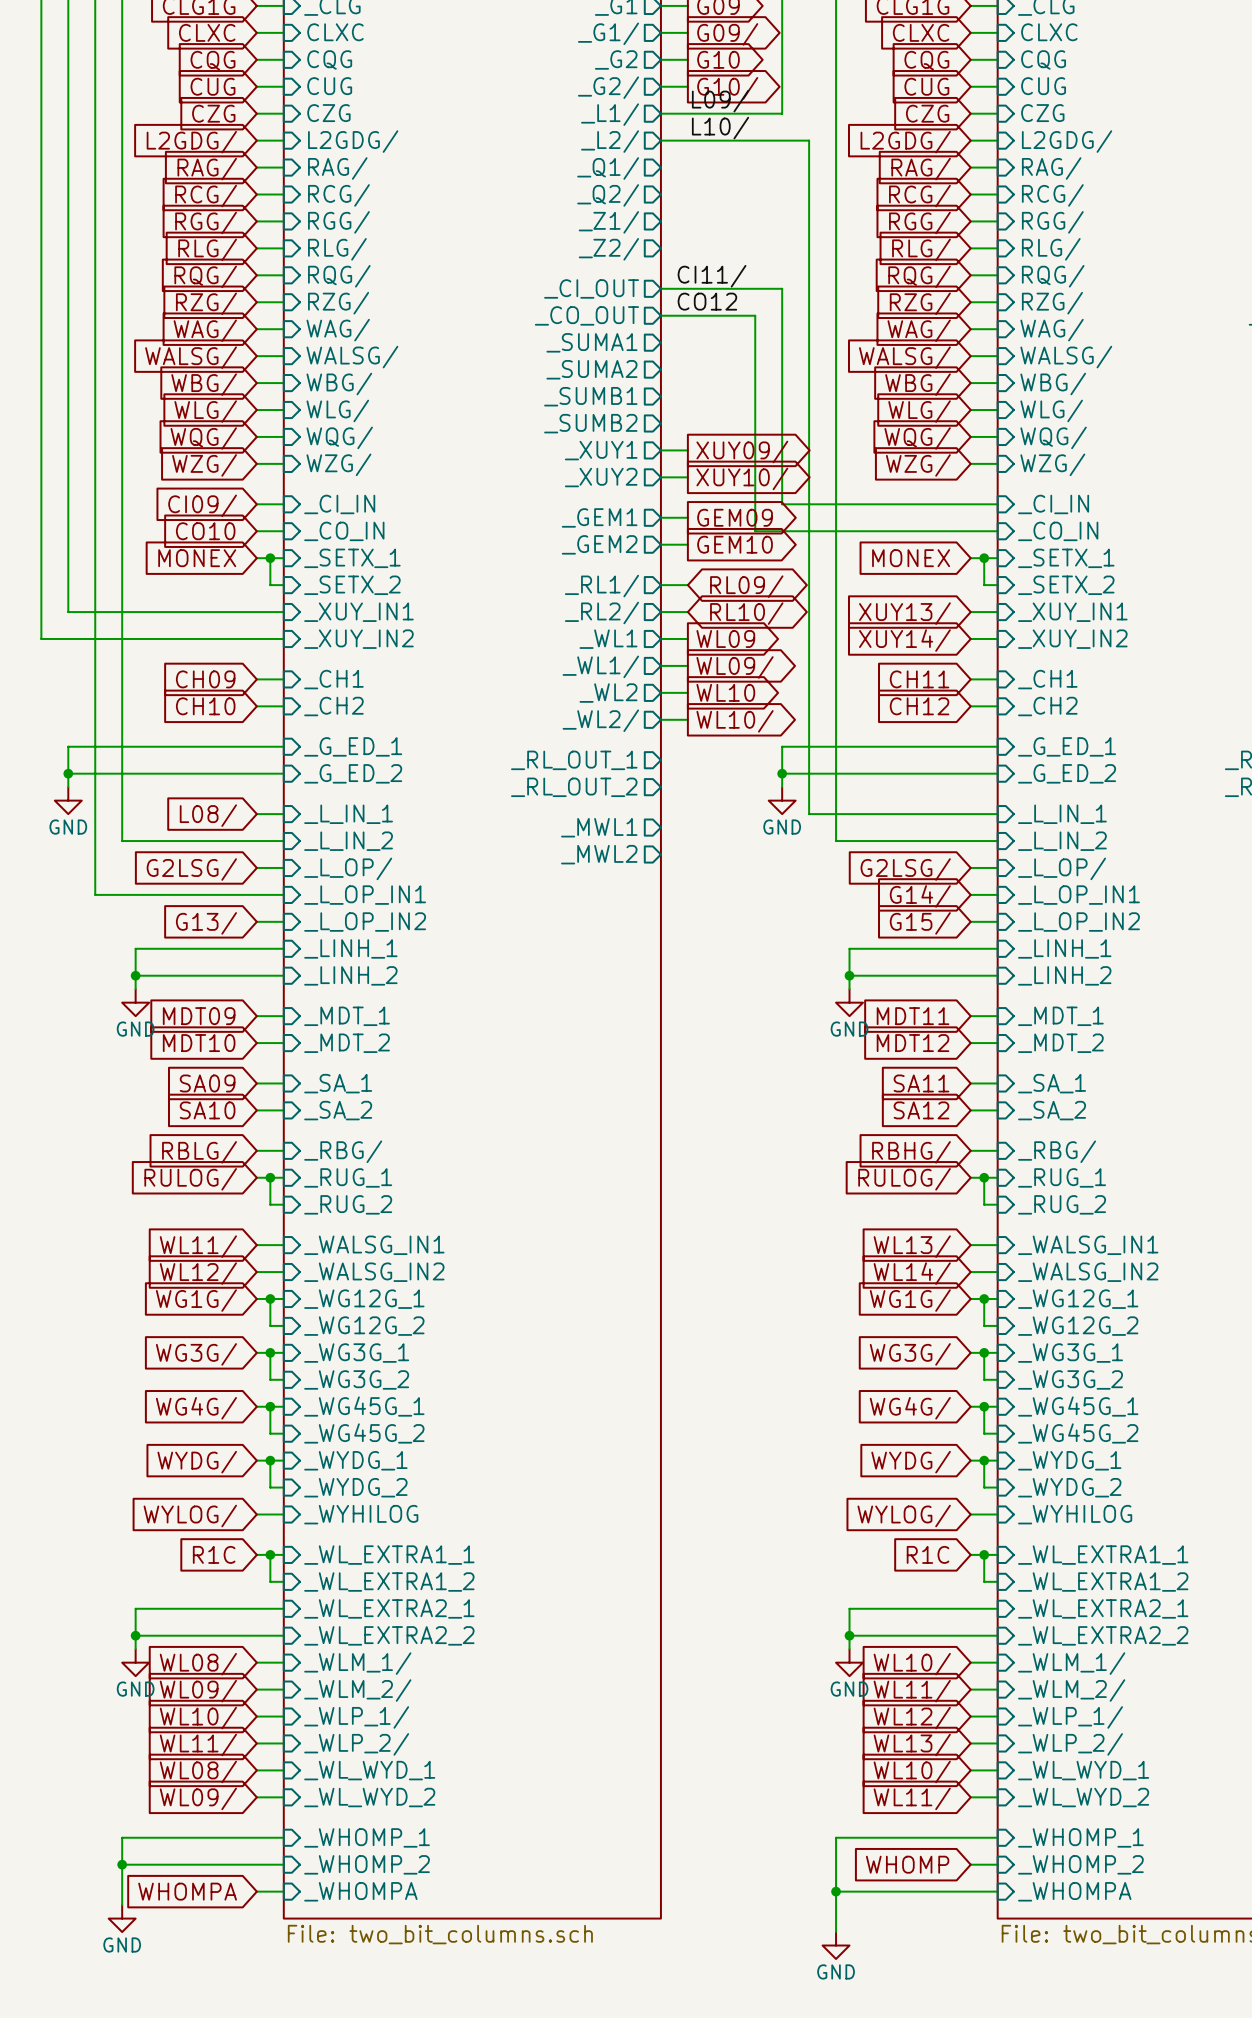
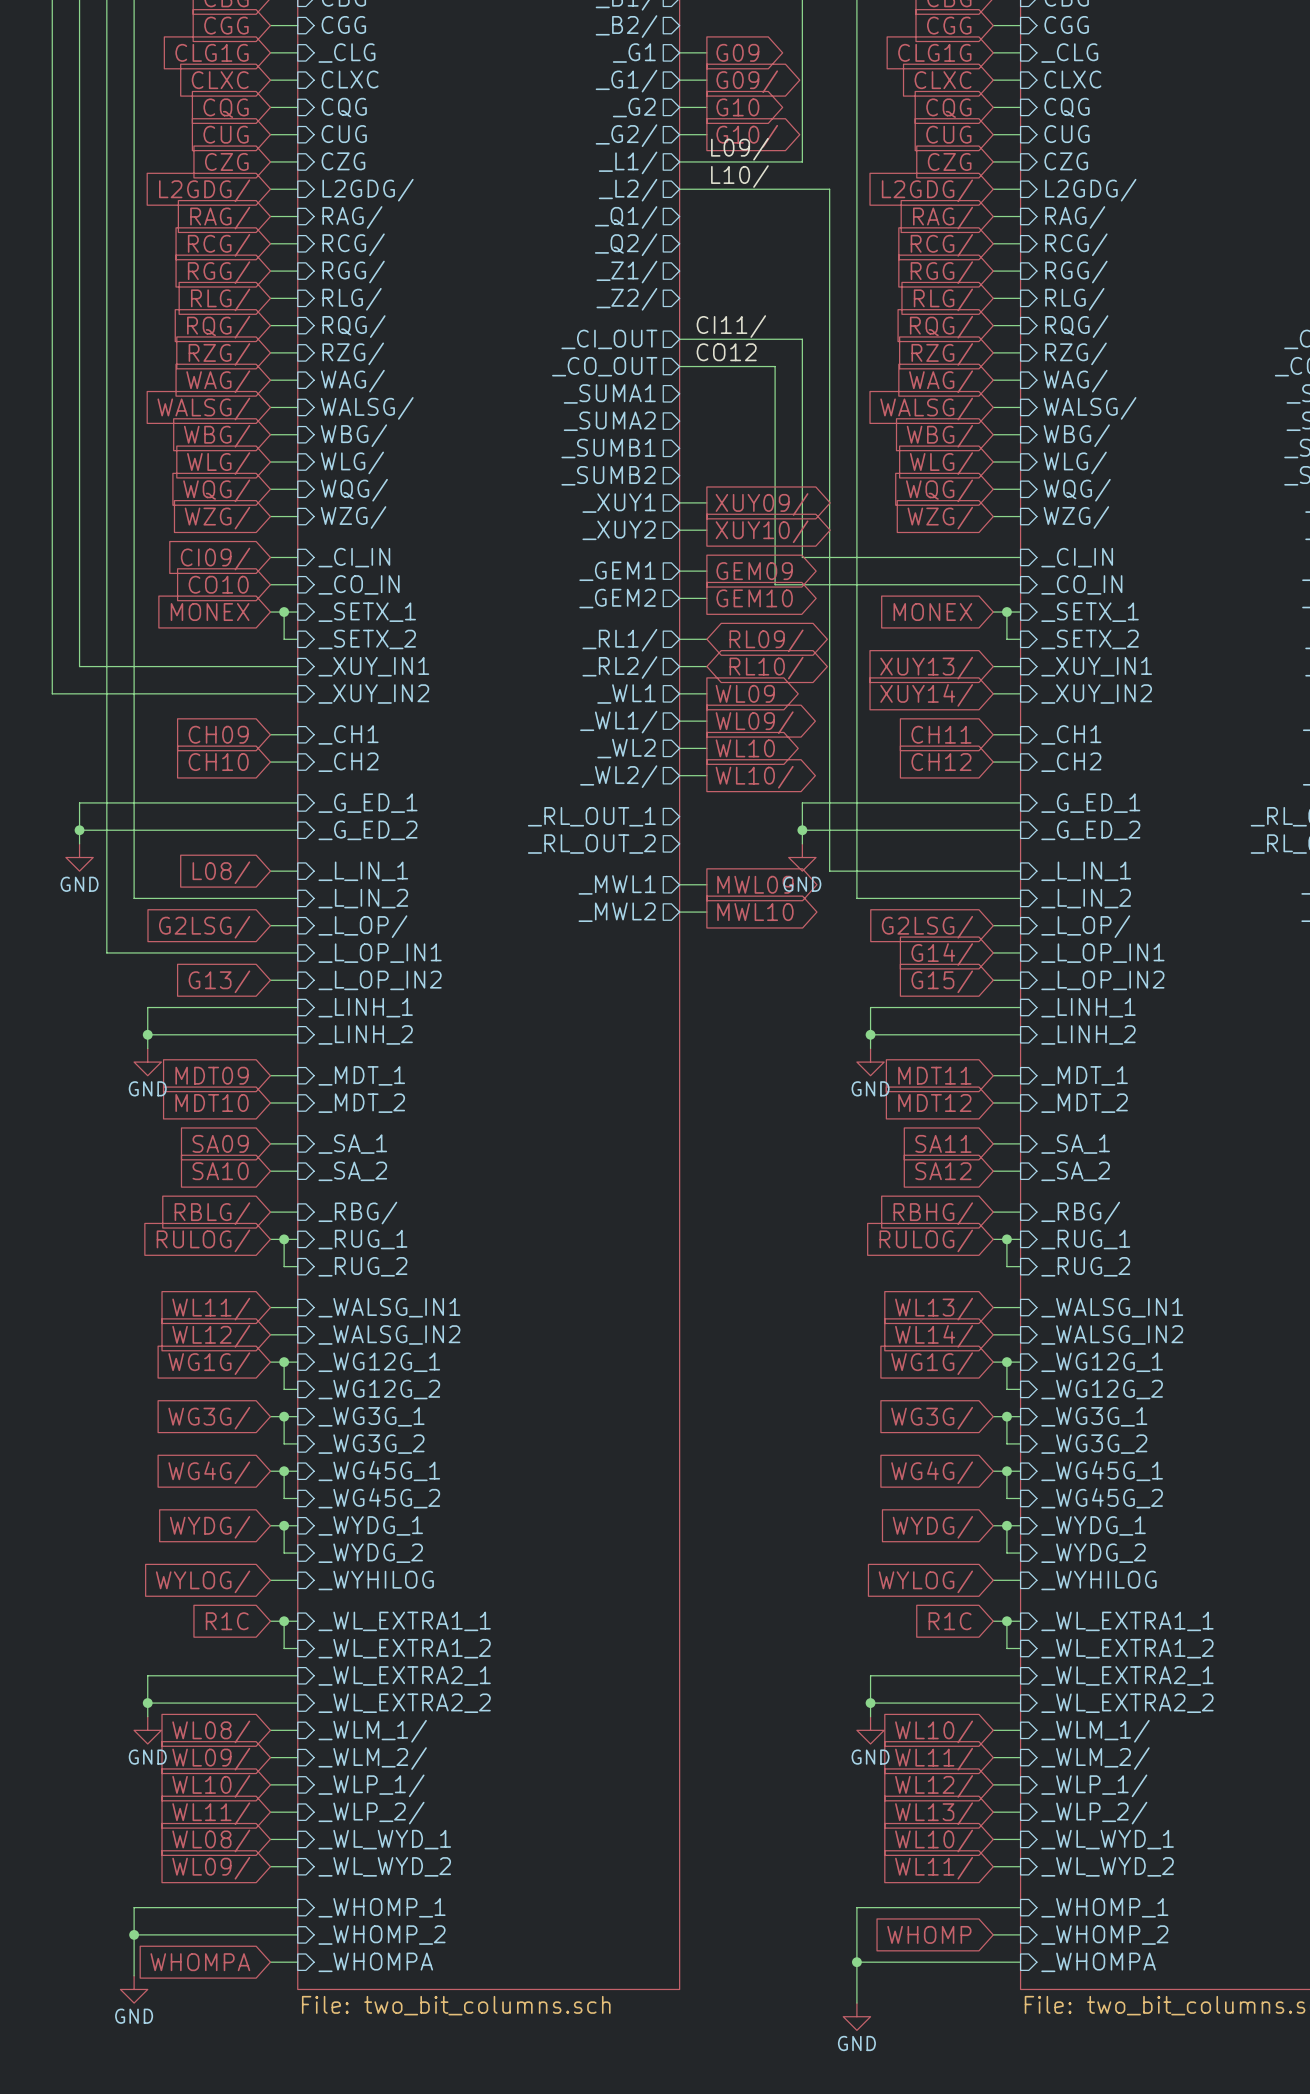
wire: none -> (679, 884) (706, 884)
global label: none -> MWL09 (755, 884)
wire: none -> (679, 912) (706, 912)
global label: none -> MWL10 (755, 912)

